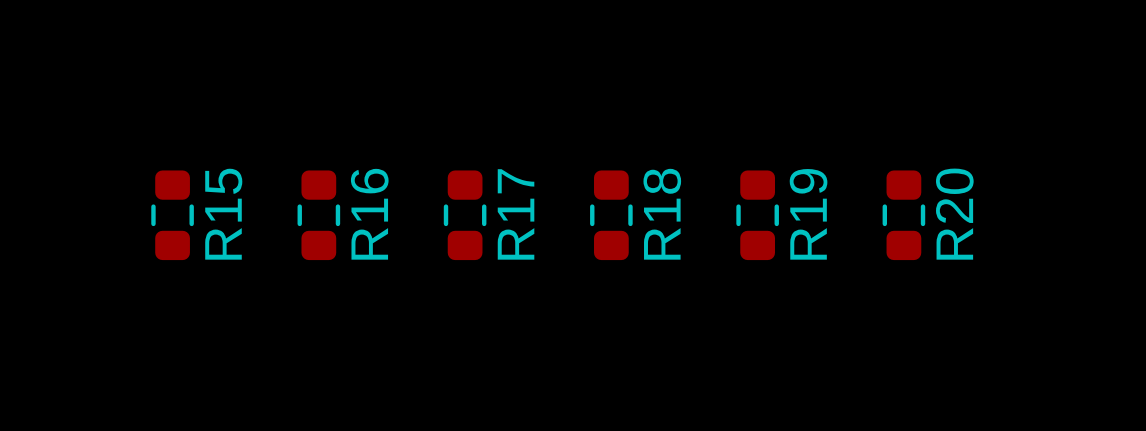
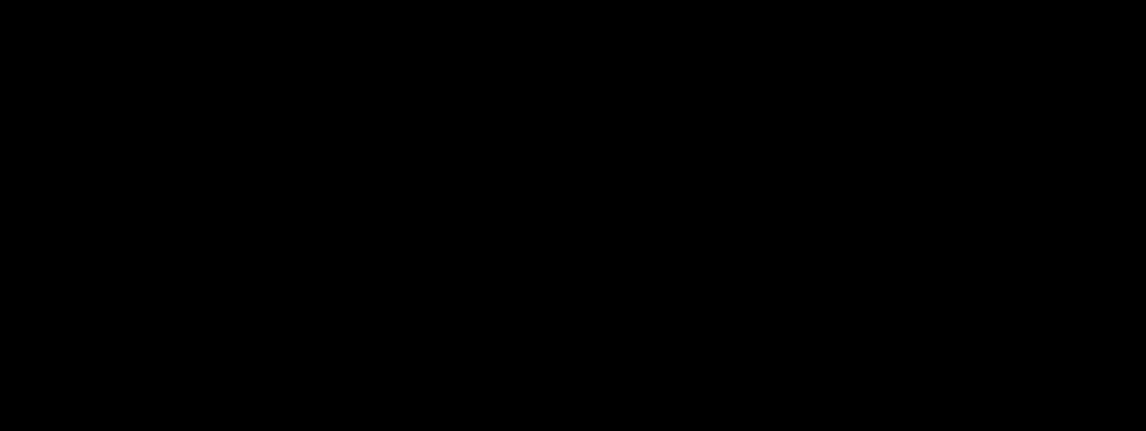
R15: (172, 215) -> none
R16: (318, 215) -> none
R17: (465, 215) -> none
R18: (611, 215) -> none
R19: (757, 215) -> none
R20: (903, 215) -> none

